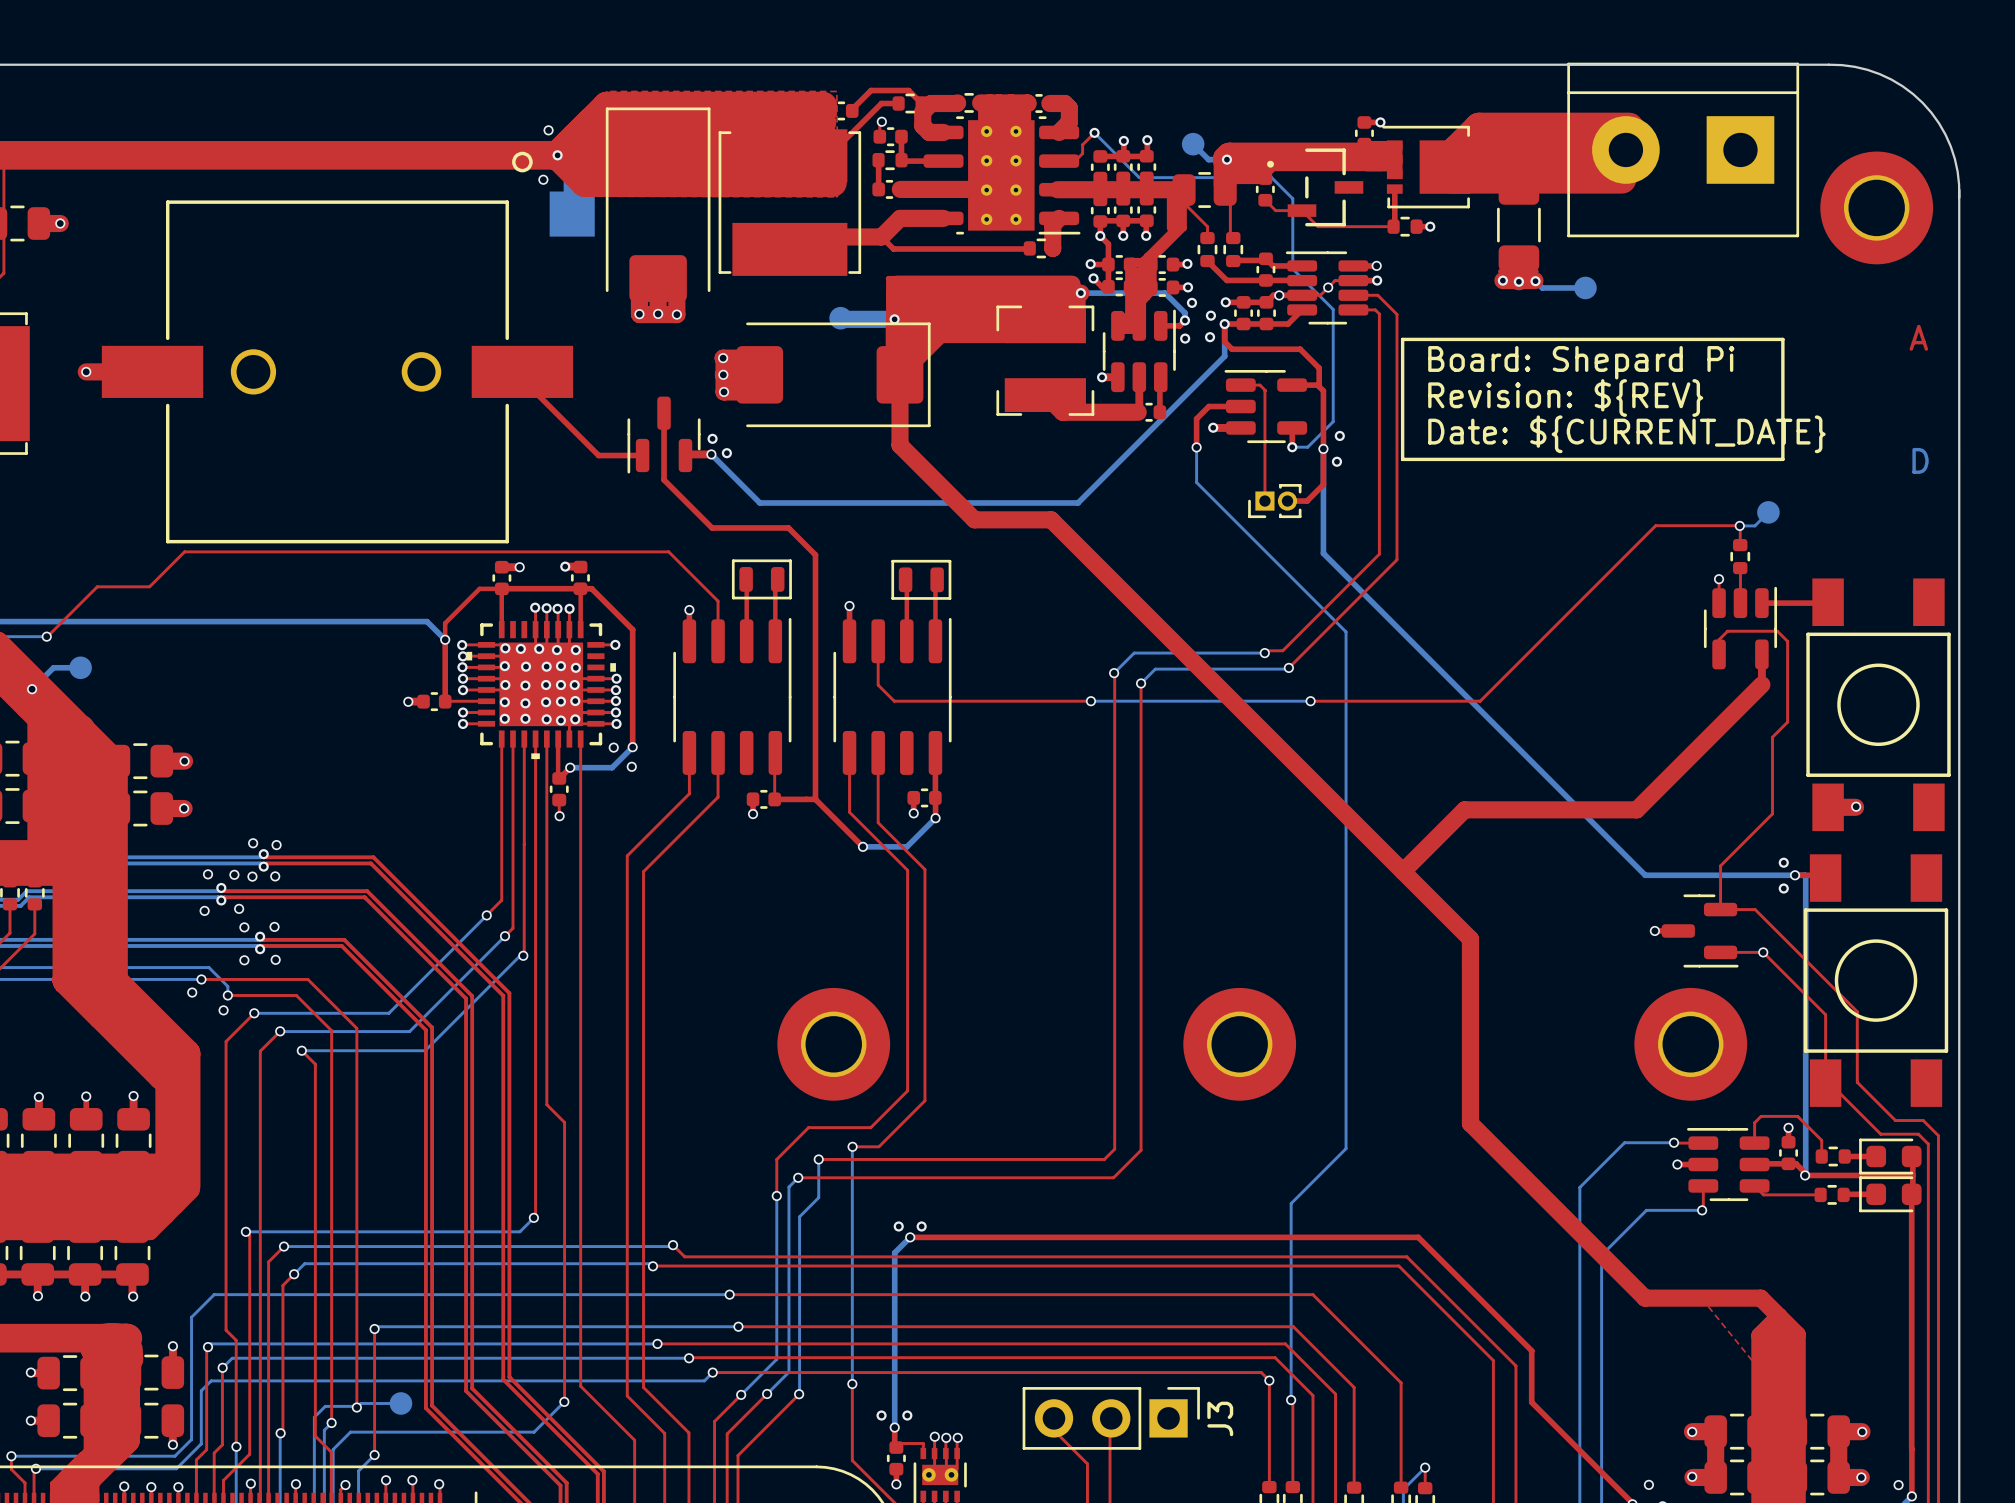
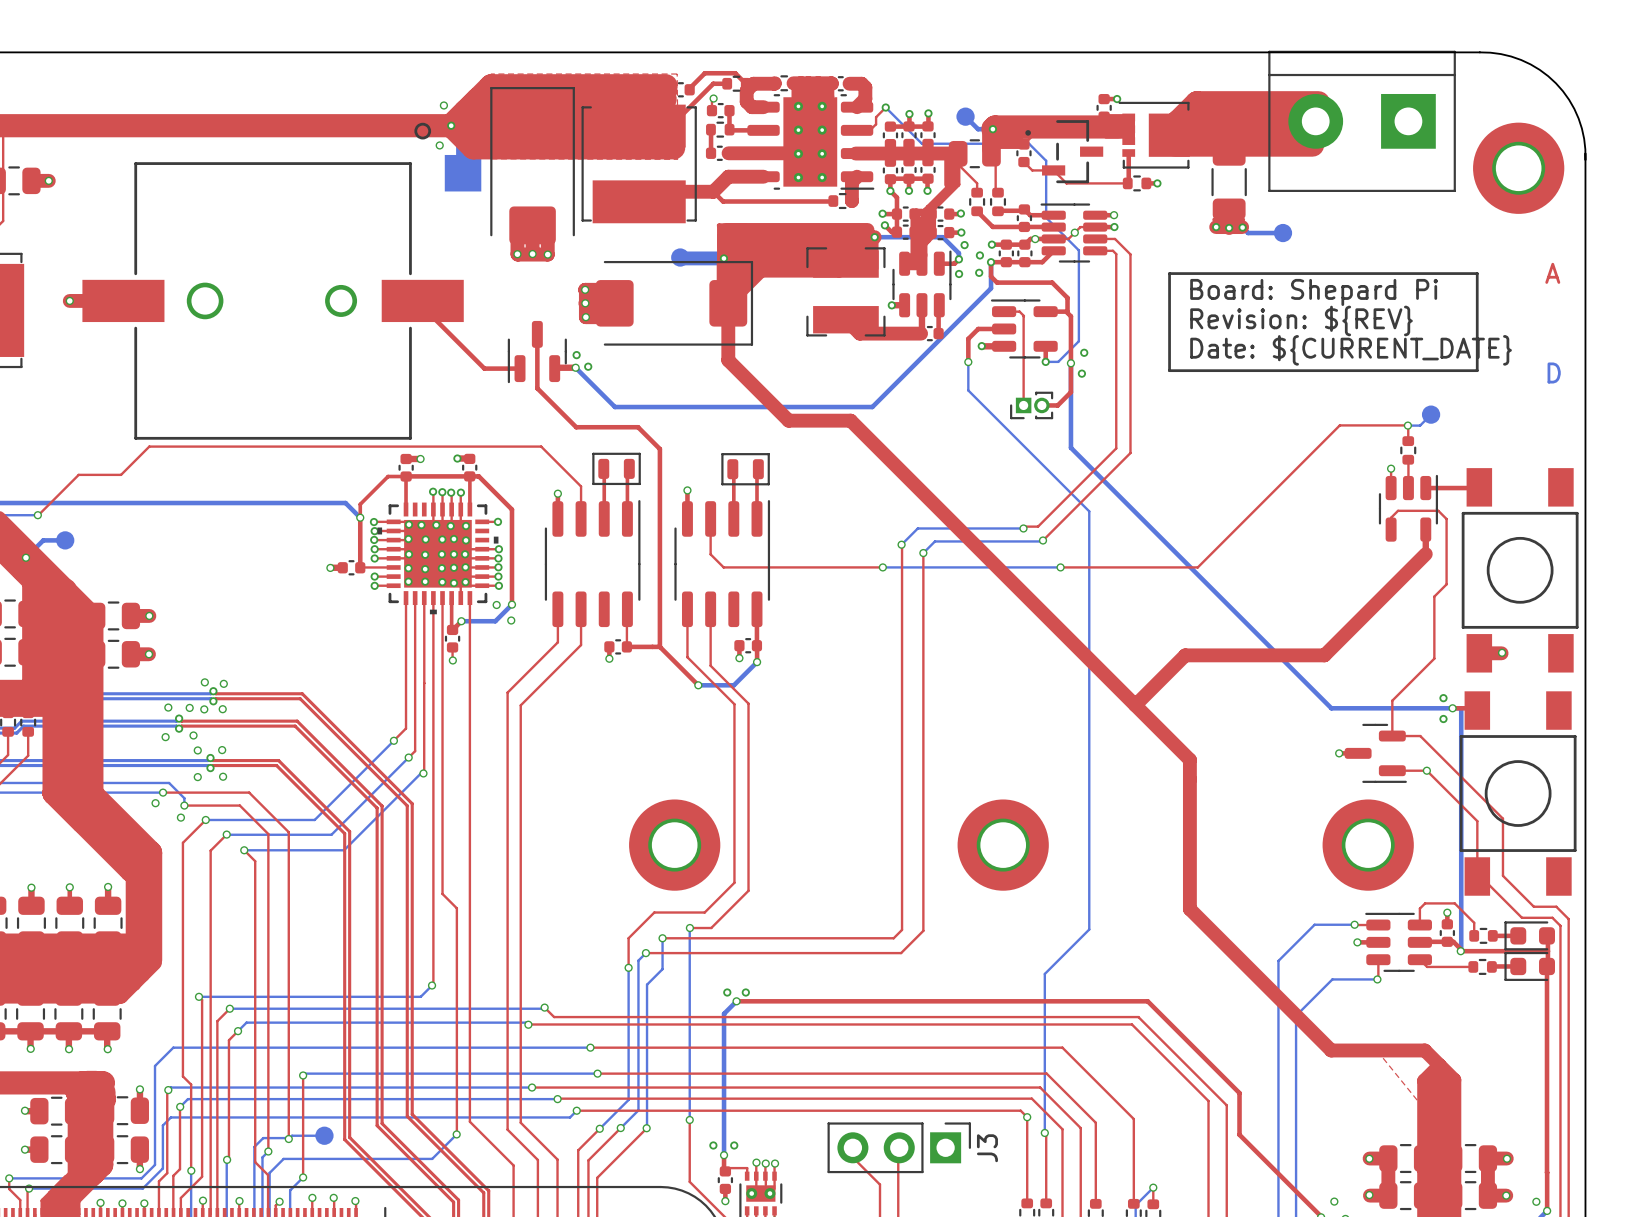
line: (1402, 339) (1782, 339) (1782, 459) (1402, 459) (1402, 339) -> (1169, 273) (1477, 273) (1477, 370) (1169, 370) (1169, 273)
text position: Board: Shepard Pi (1581, 362) -> Board: Shepard Pi (1314, 292)
text position: Revision: ${REV} (1565, 397) -> Revision: ${REV} (1301, 320)
text position: Date: ${CURRENT_DATE} (1626, 434) -> Date: ${CURRENT_DATE} (1351, 350)

